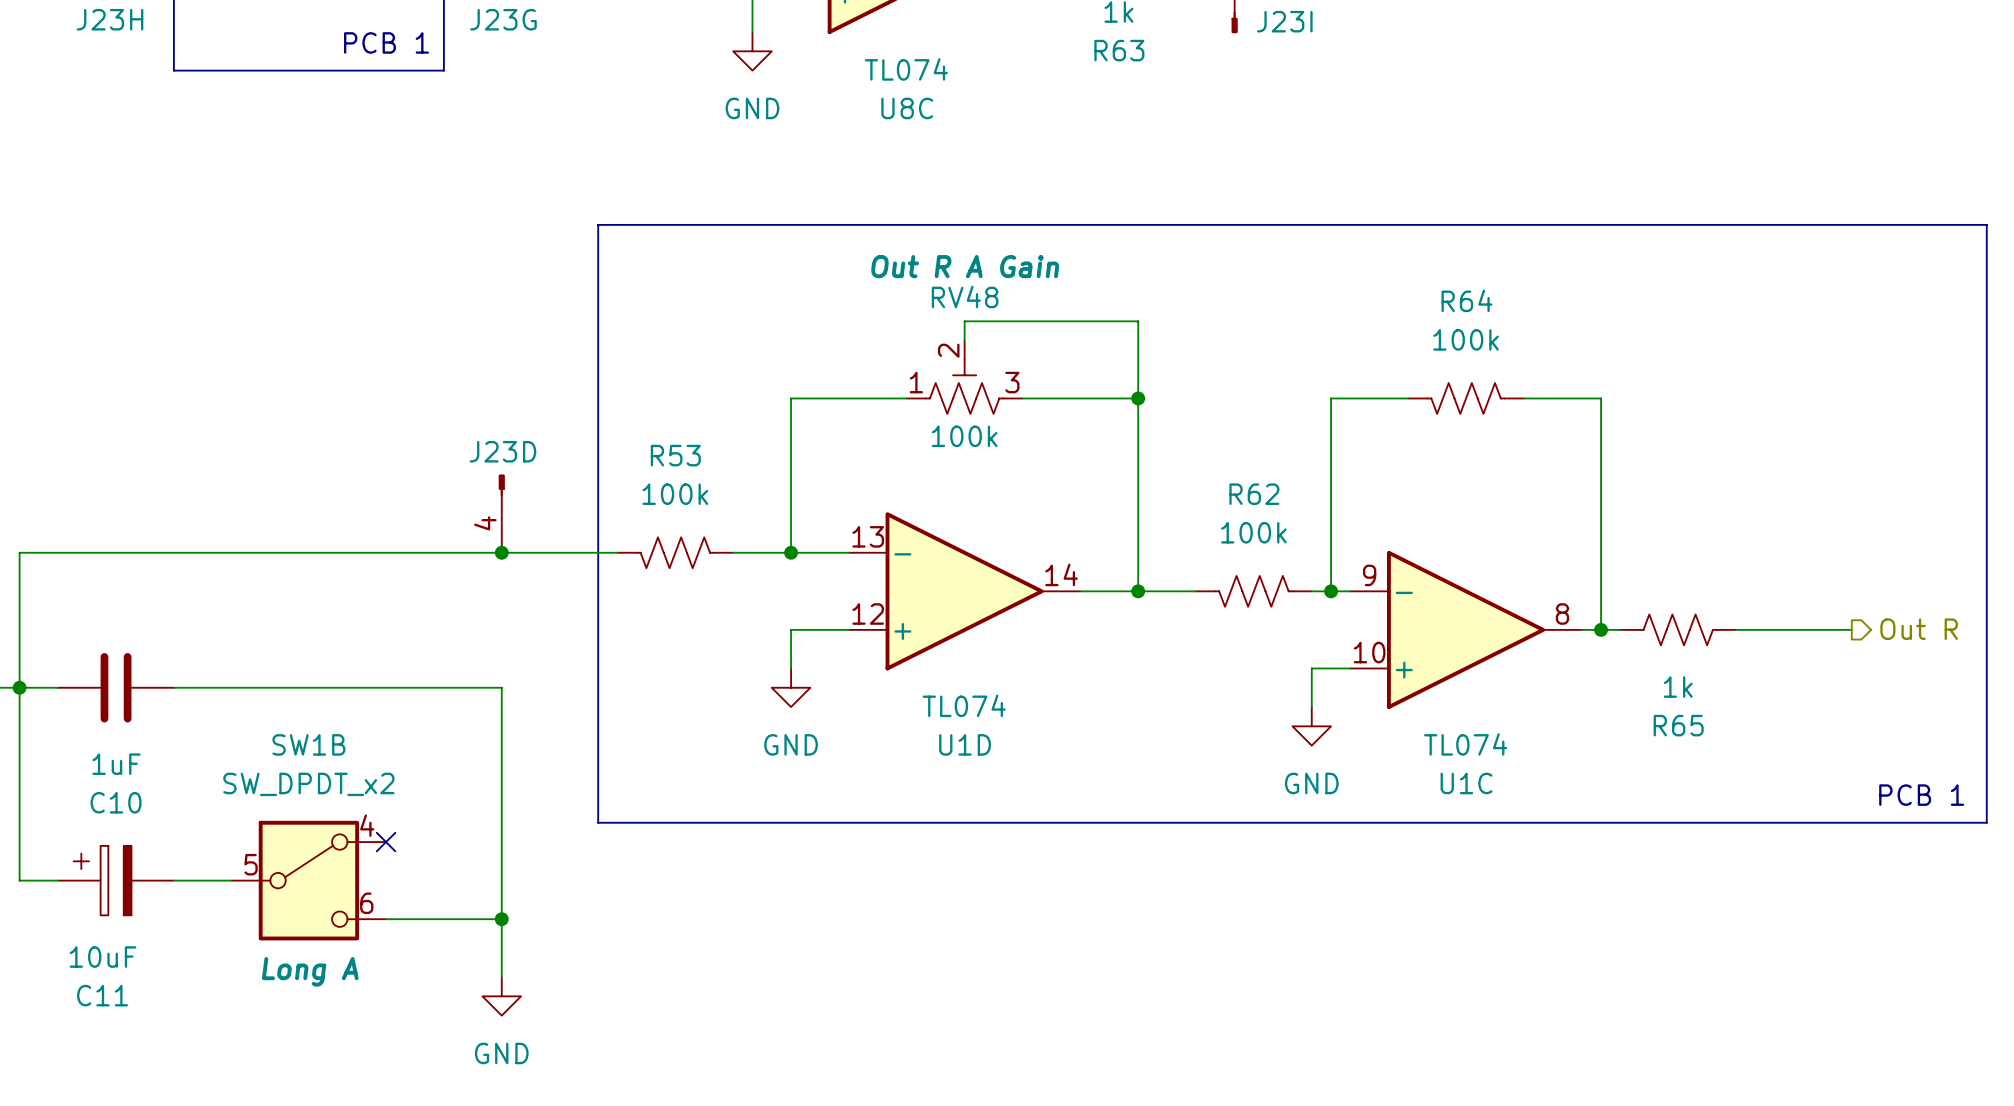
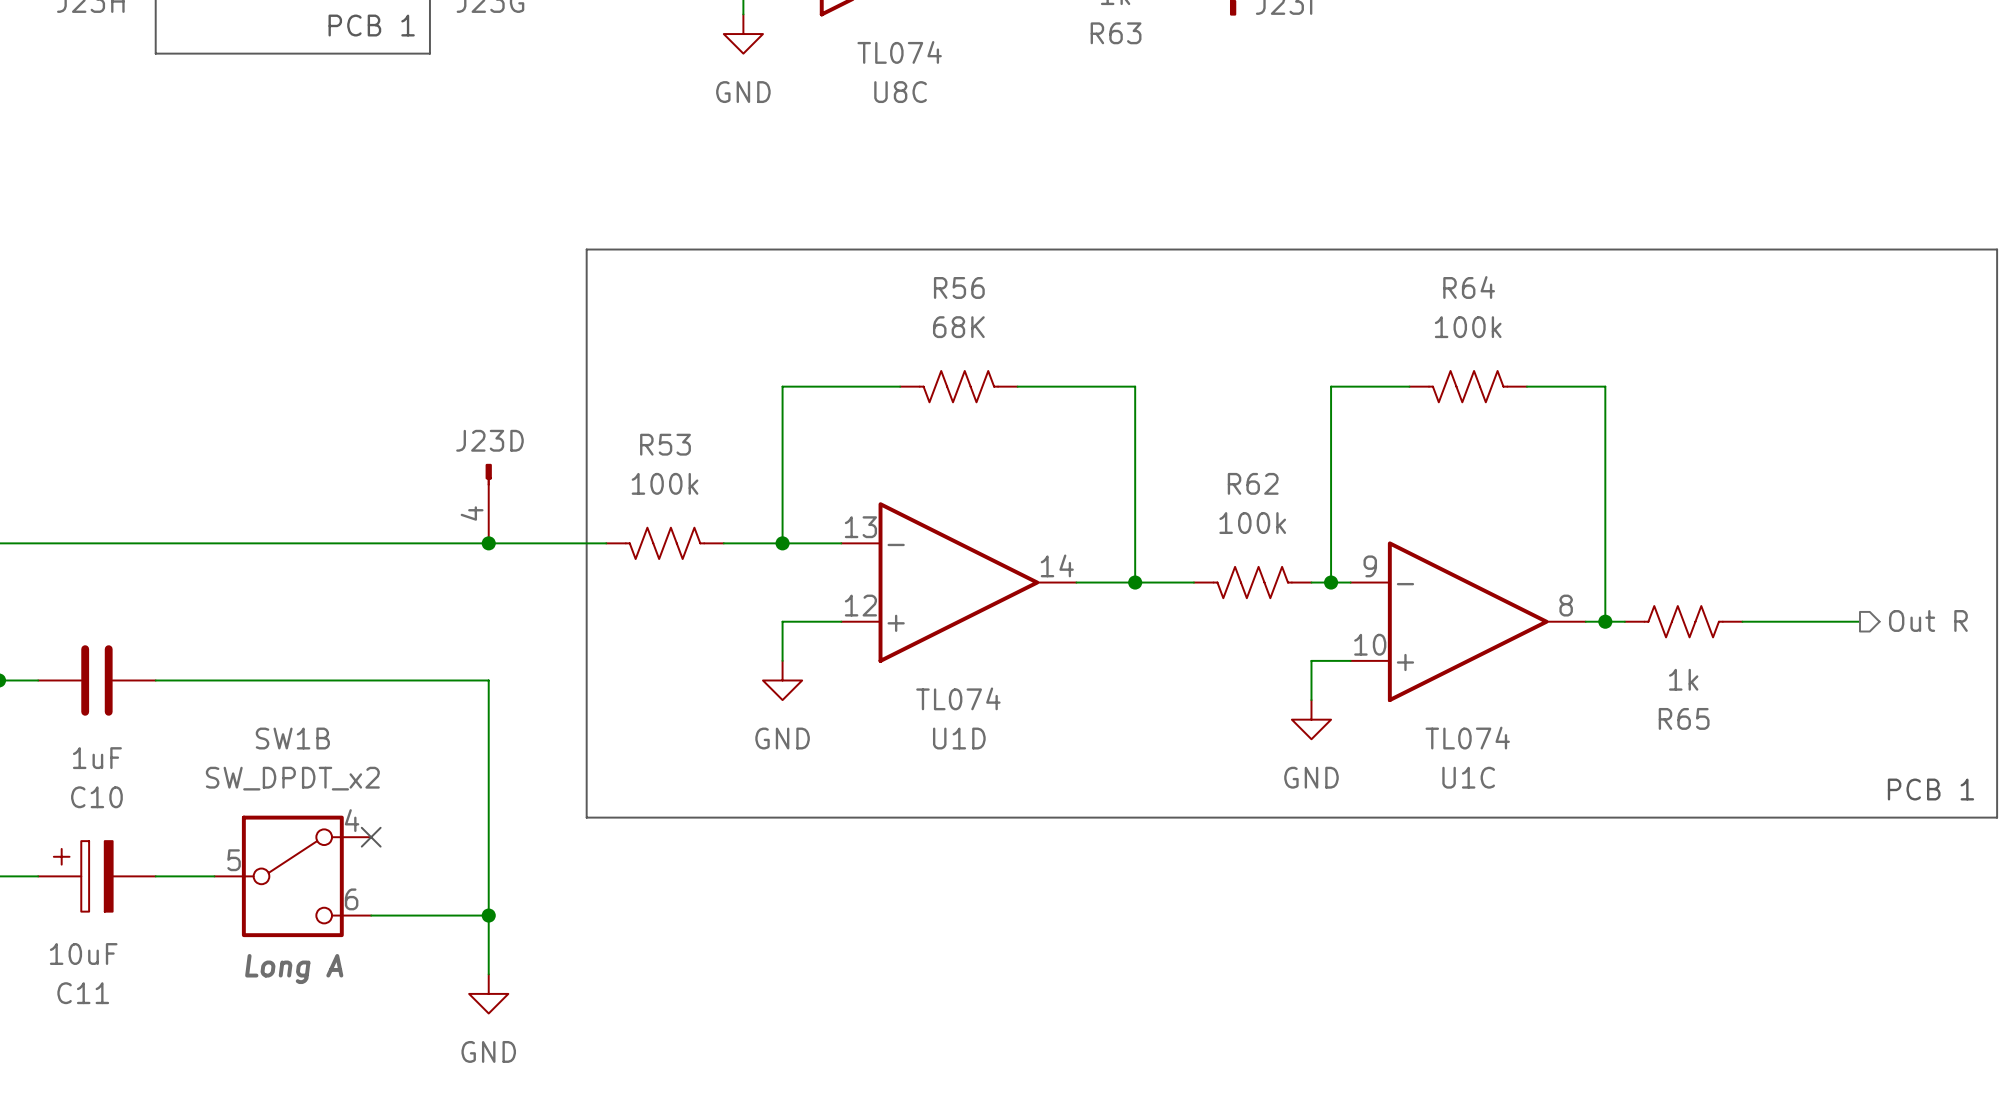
line: (598, 263) (598, 224) (1986, 224) (1986, 263) -> (586, 249) (1997, 249)
wire: (964, 340) (964, 321) (1138, 321) (1138, 398) -> none
RV48: 100k (964, 377) -> none
R56: none -> 68K (958, 386)
junction: (1138, 398) -> none

